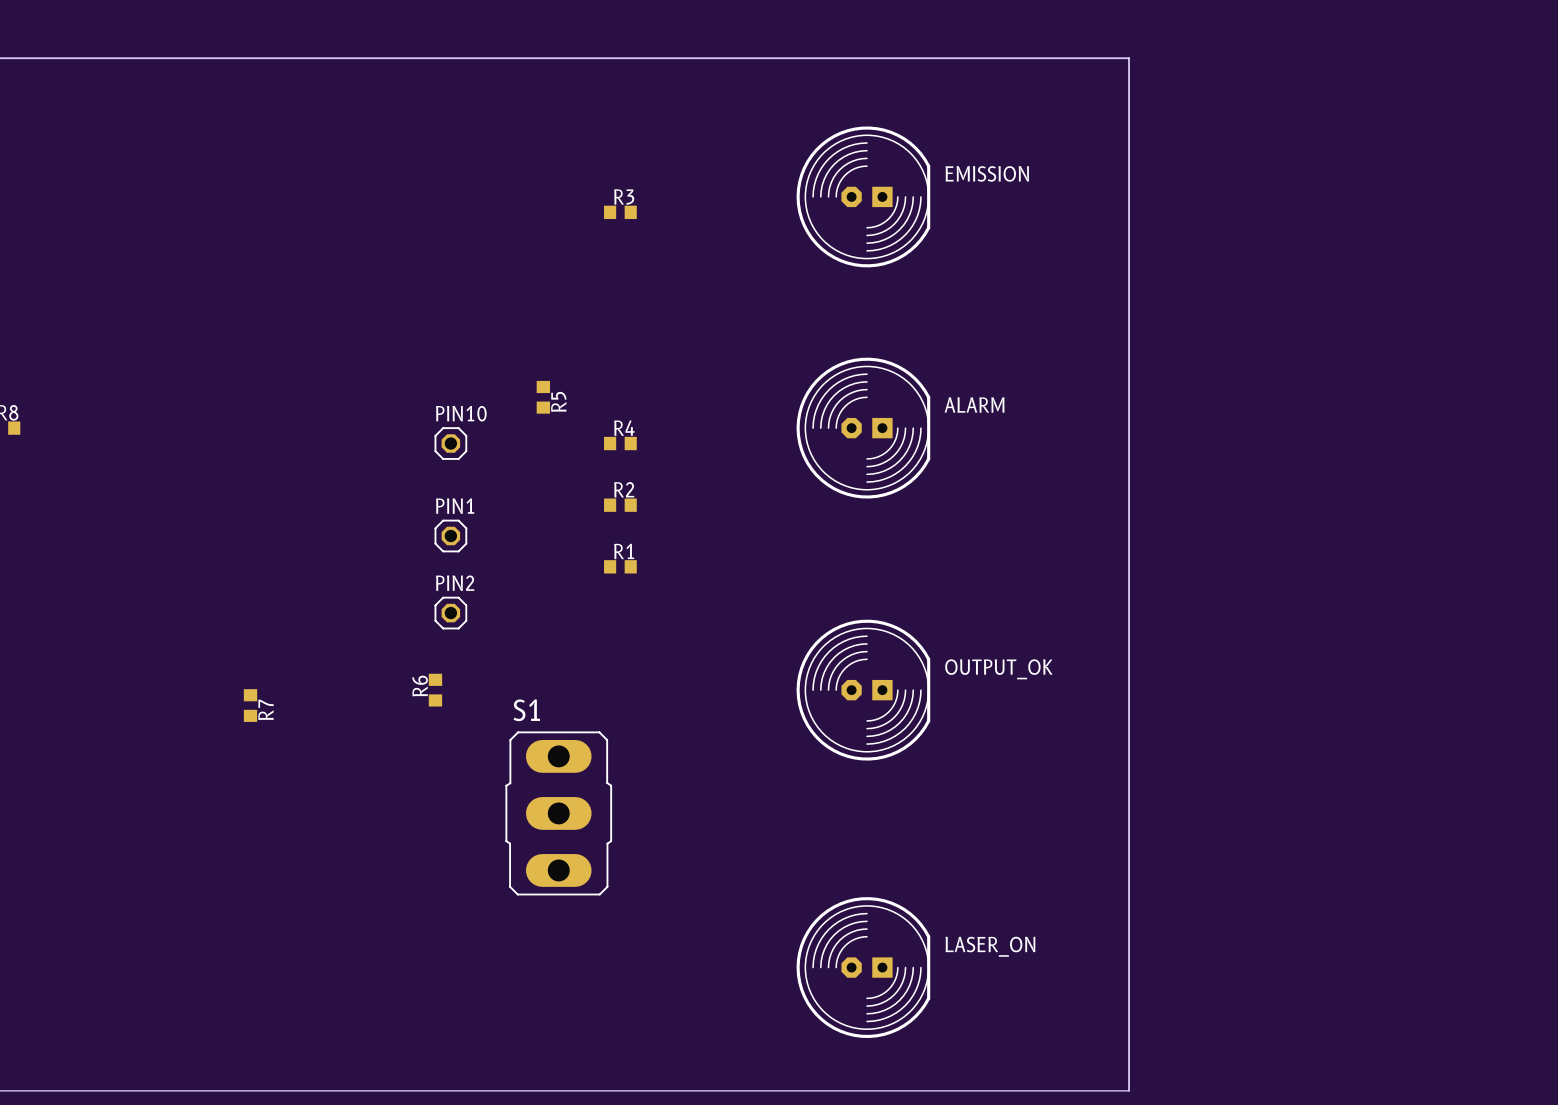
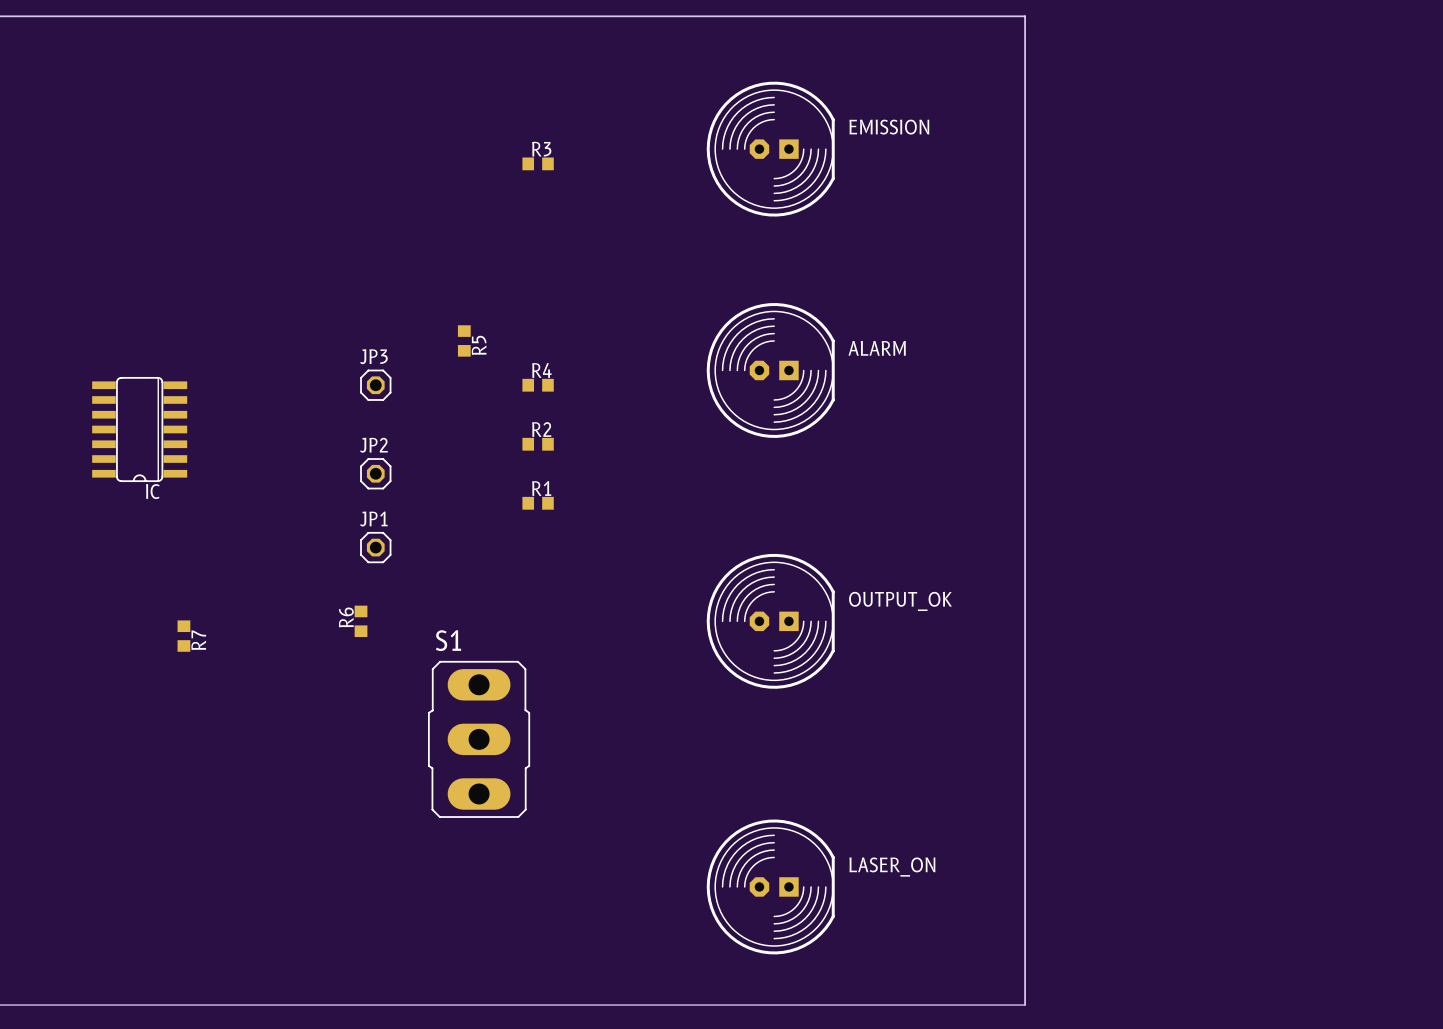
PIN10 name: PIN10 (461, 413) -> JP3 (373, 356)
IC: none -> (139, 429)
PIN1 name: PIN1 (455, 506) -> JP2 (373, 445)
PIN2 name: PIN2 (455, 583) -> JP1 (373, 519)

